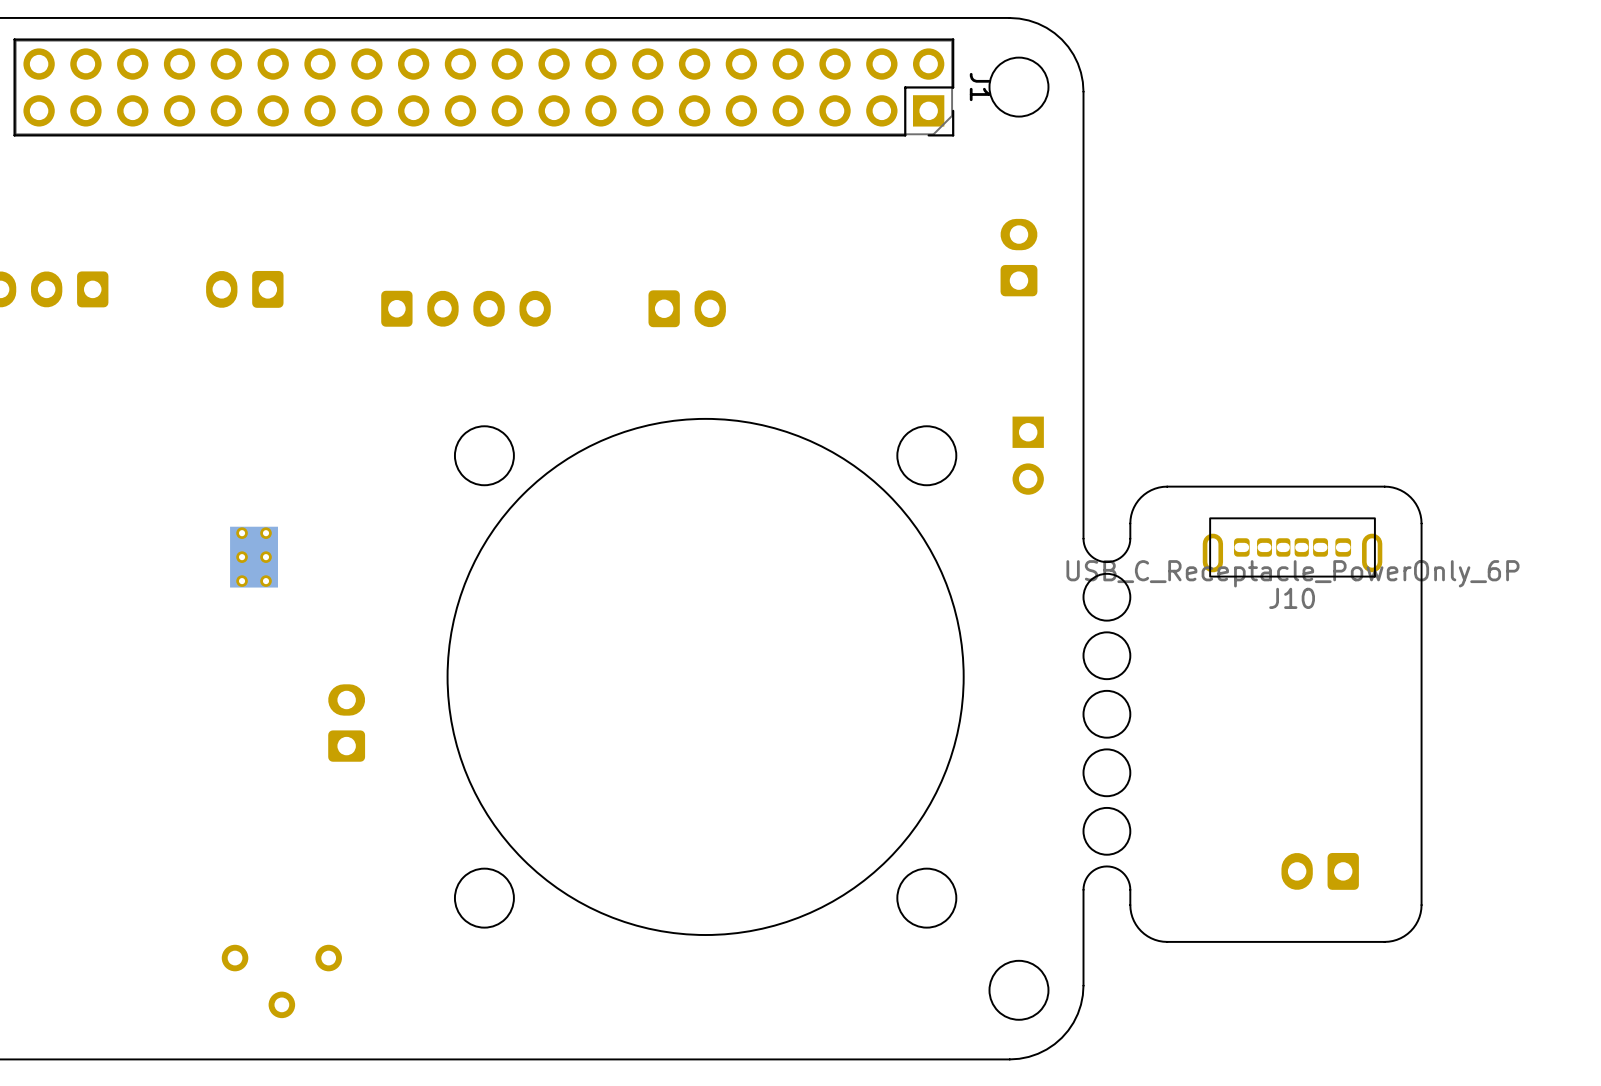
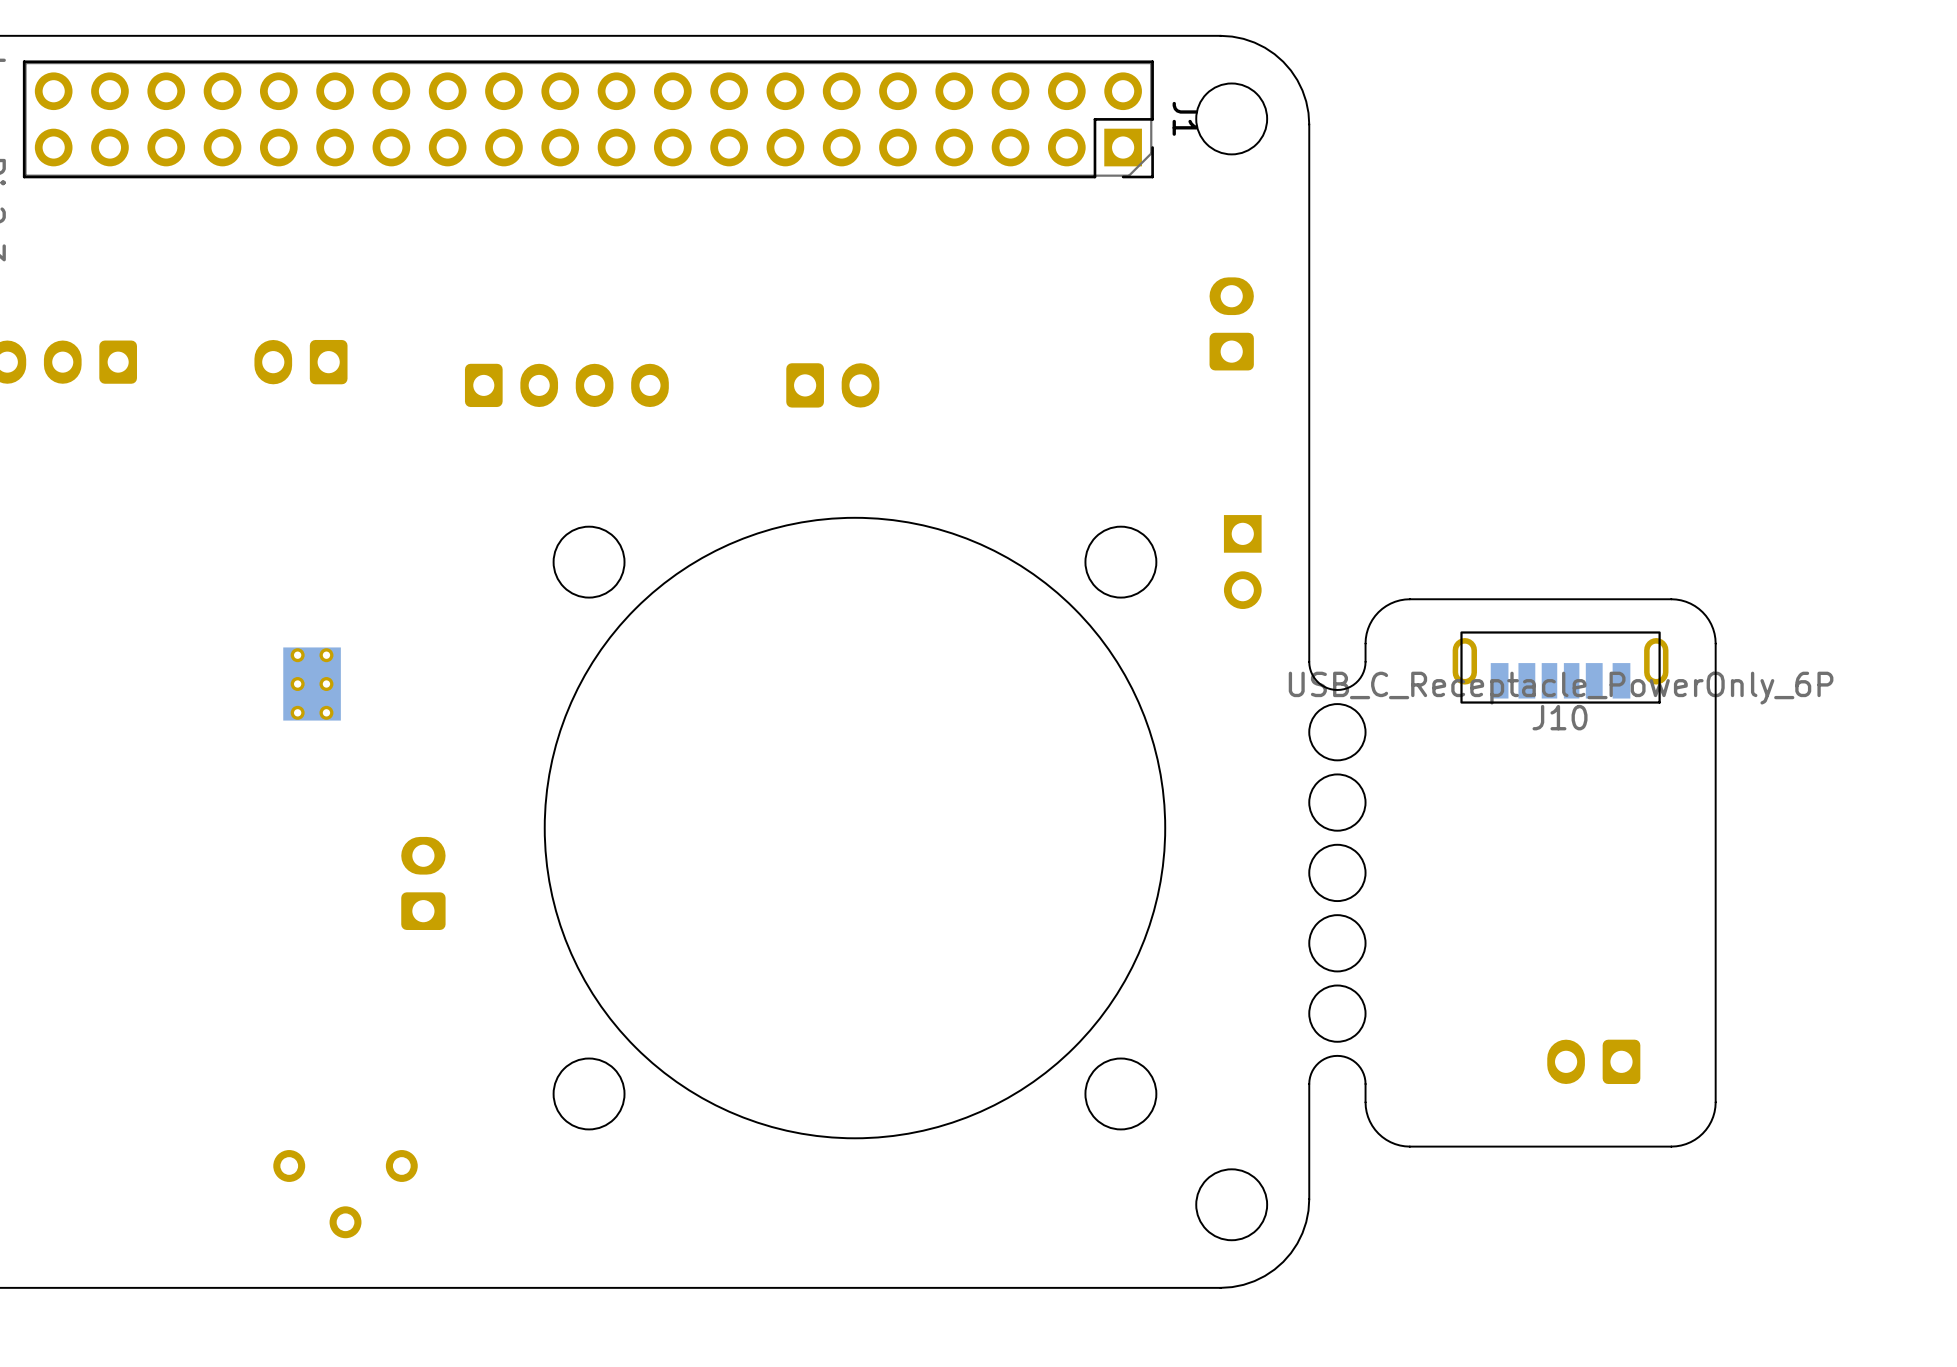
J10 footprint: [1202, 517, 1383, 578] -> [1452, 631, 1669, 704]

